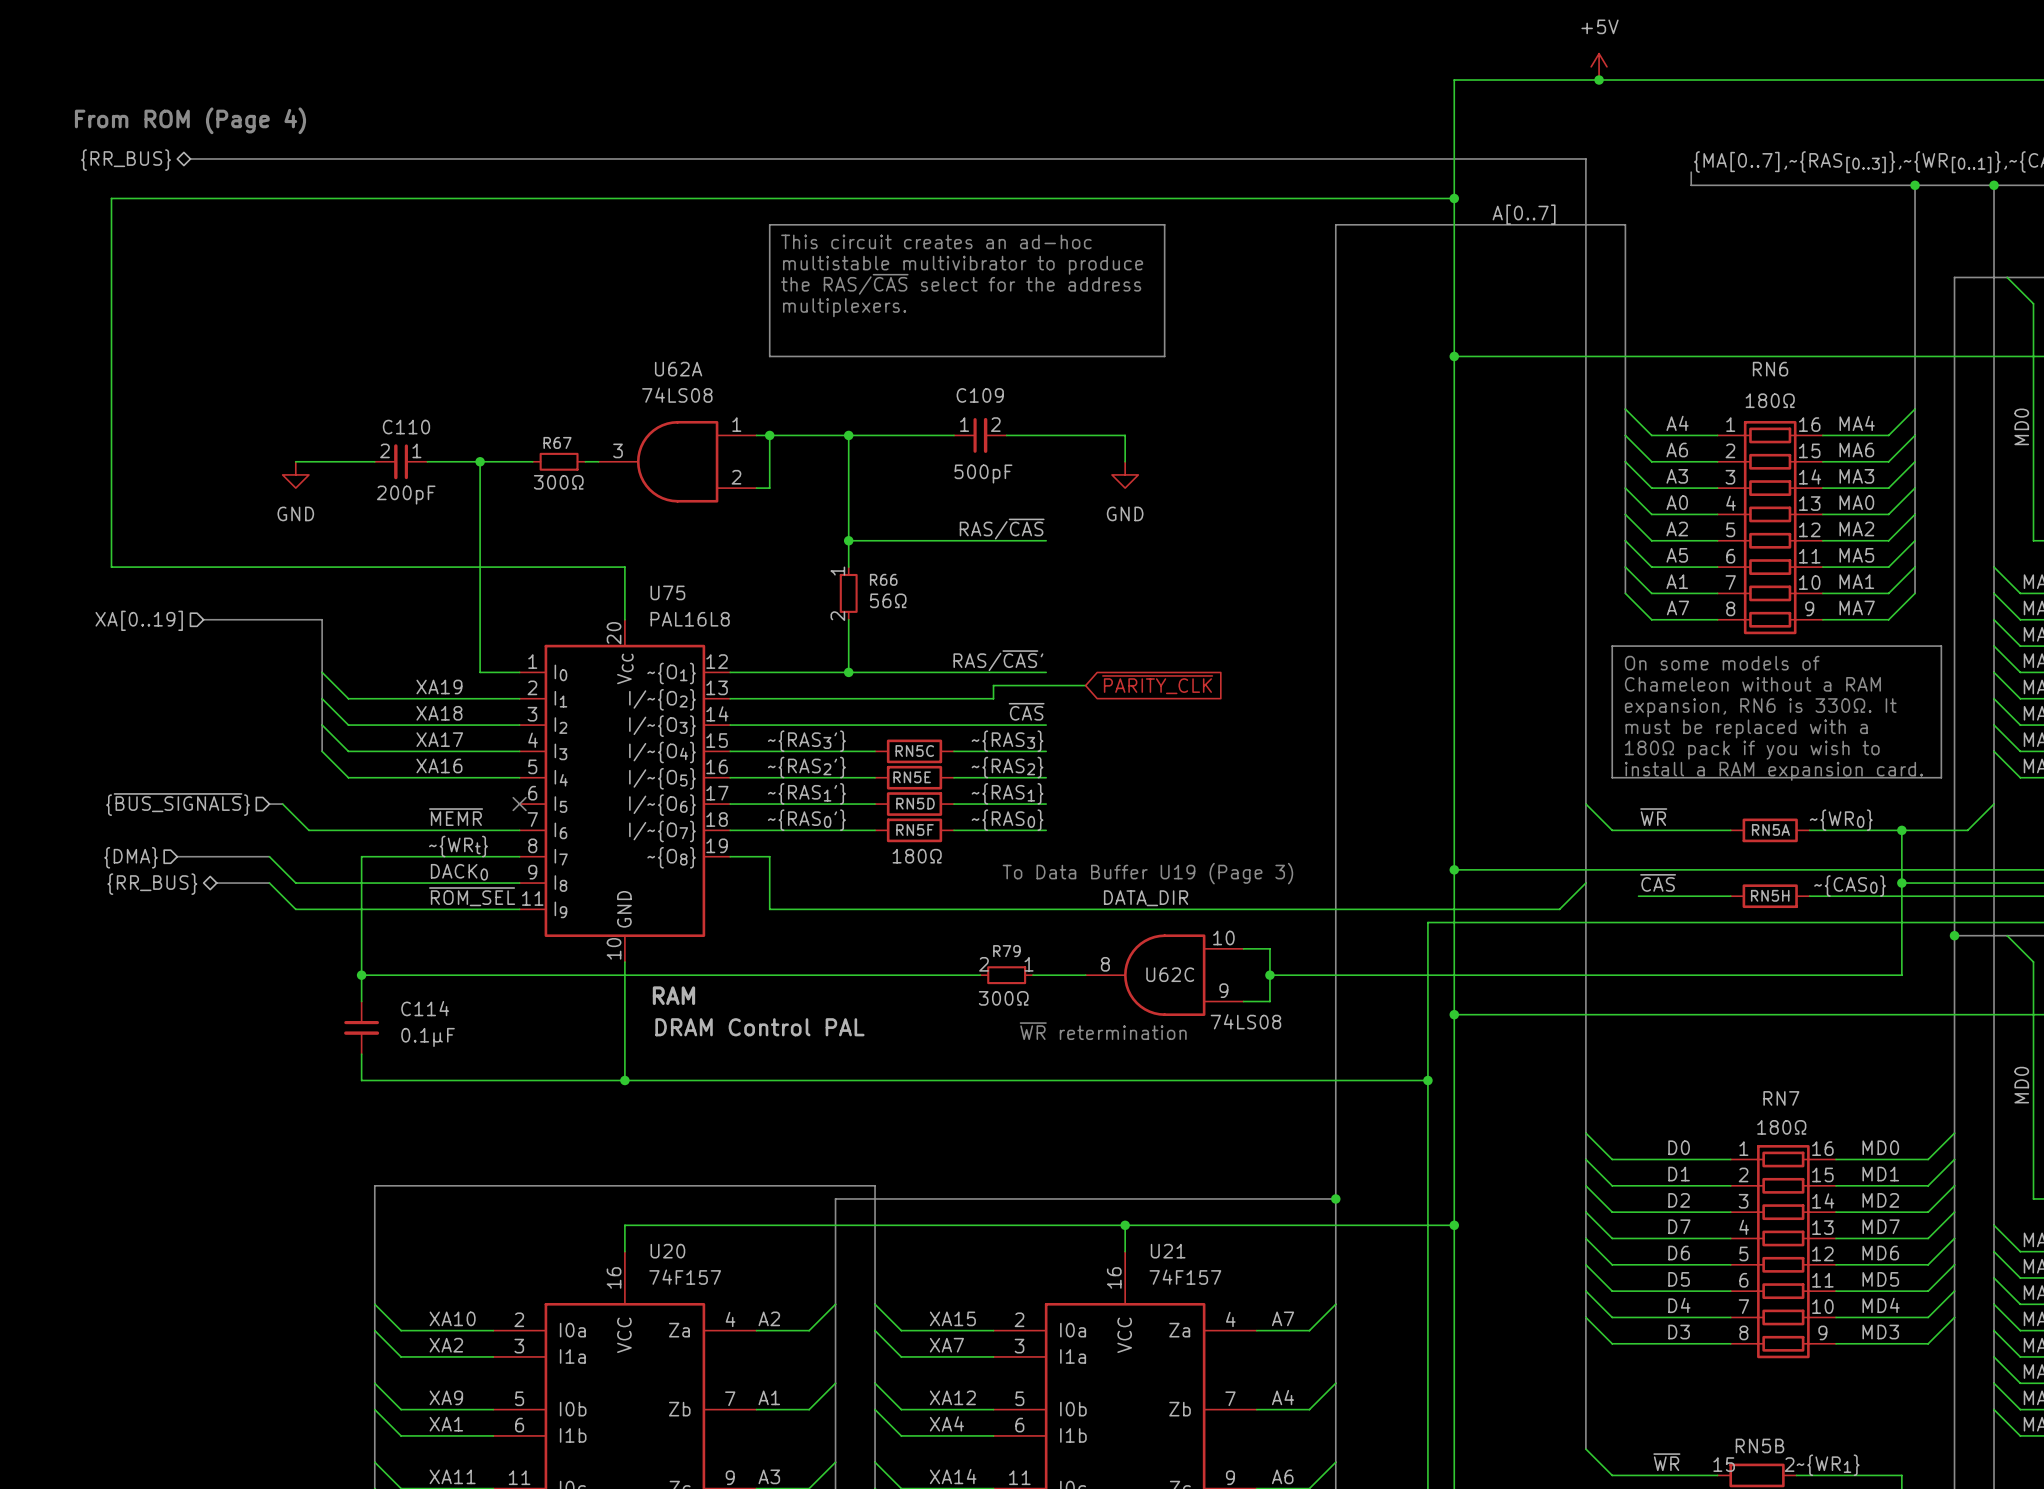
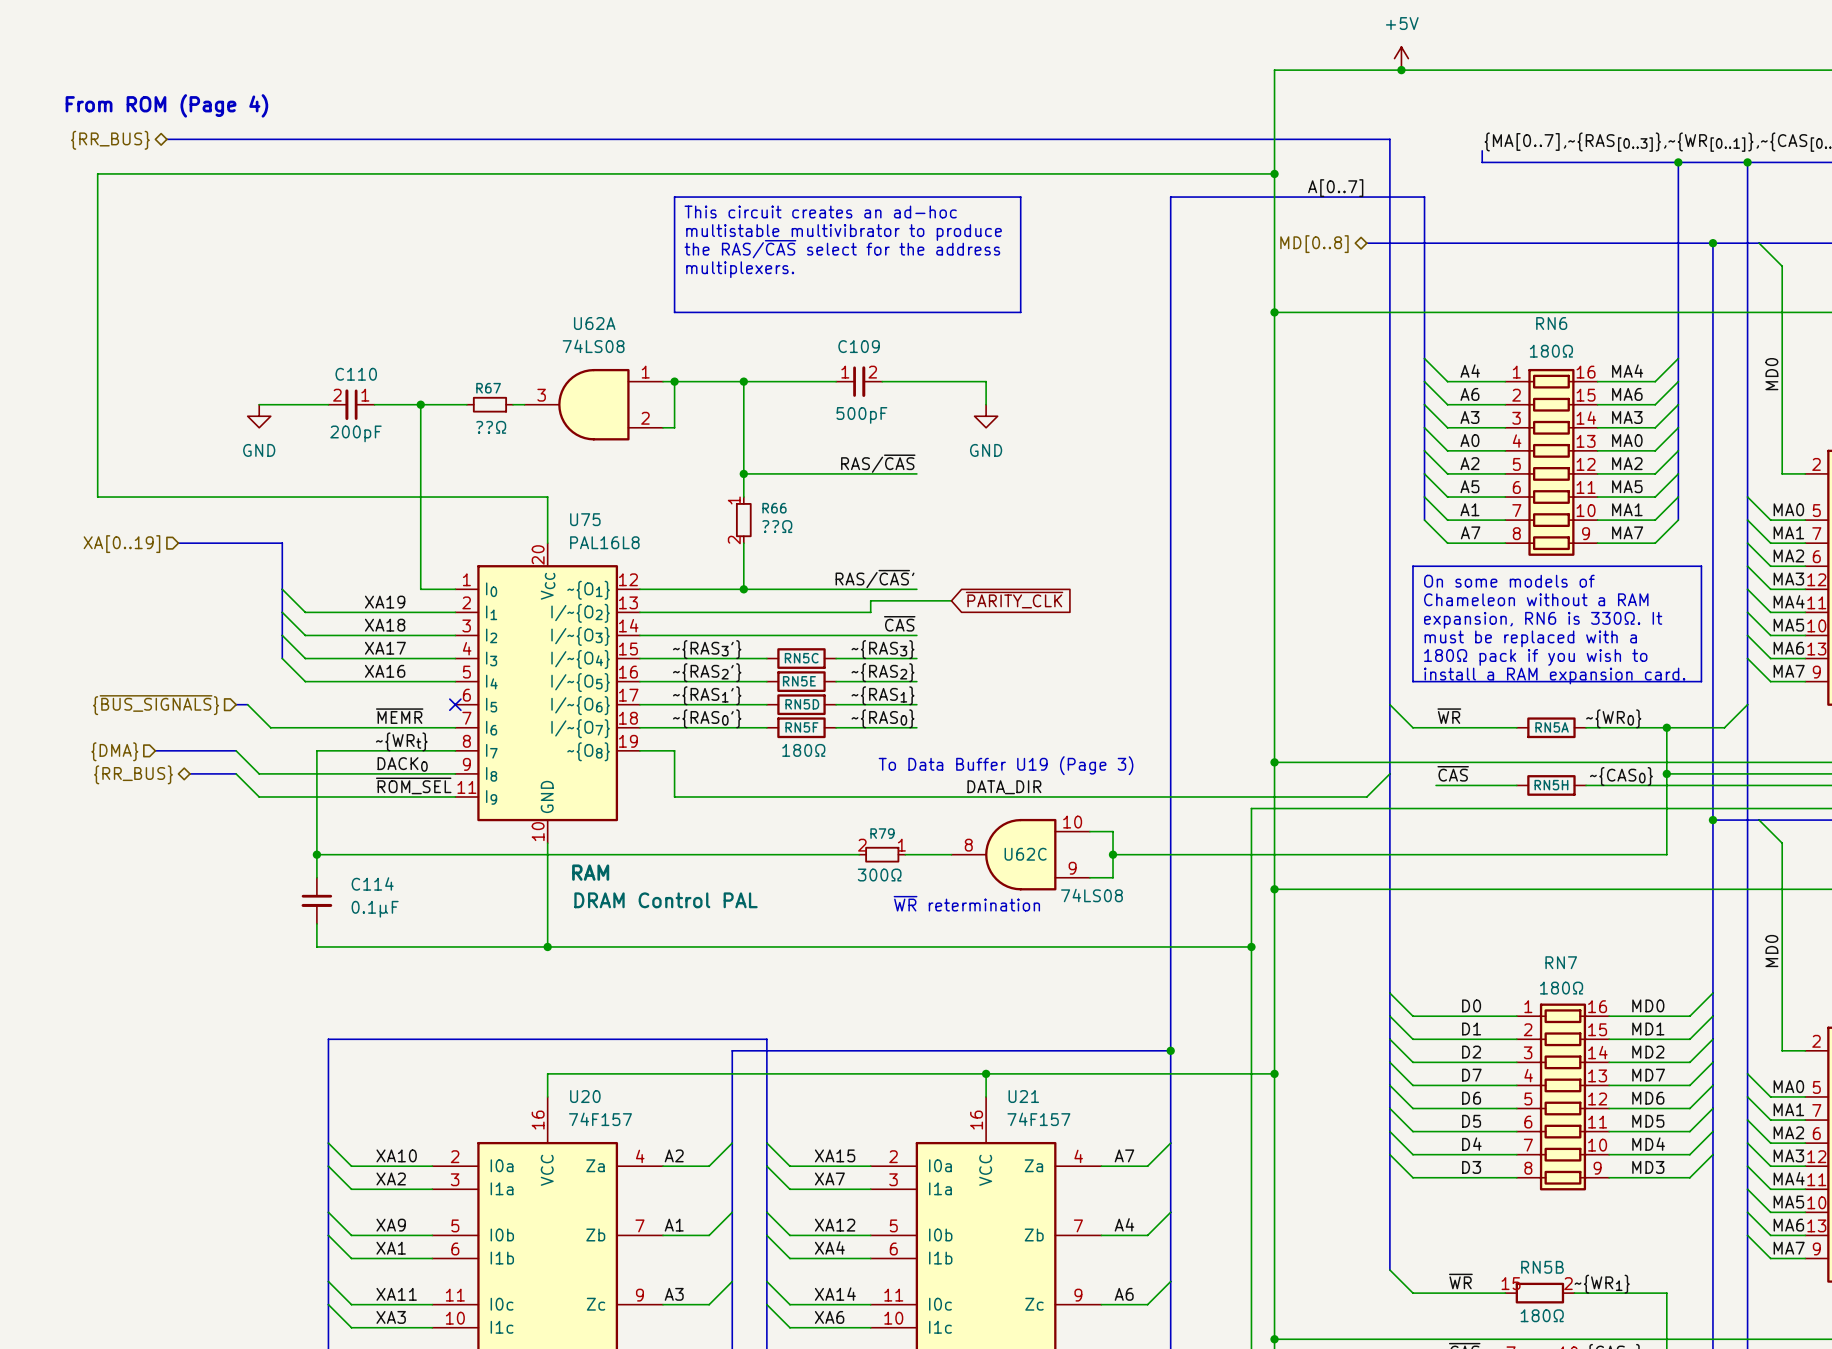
bus: none -> (1366, 243) (1712, 243)
junction: none -> (1712, 243)
hierarchical label: none -> MD[0..8] (1314, 244)
R67 value: 300Ω (558, 482) -> ??Ω (491, 427)
R66 value: 56Ω (888, 600) -> ??Ω (777, 526)

